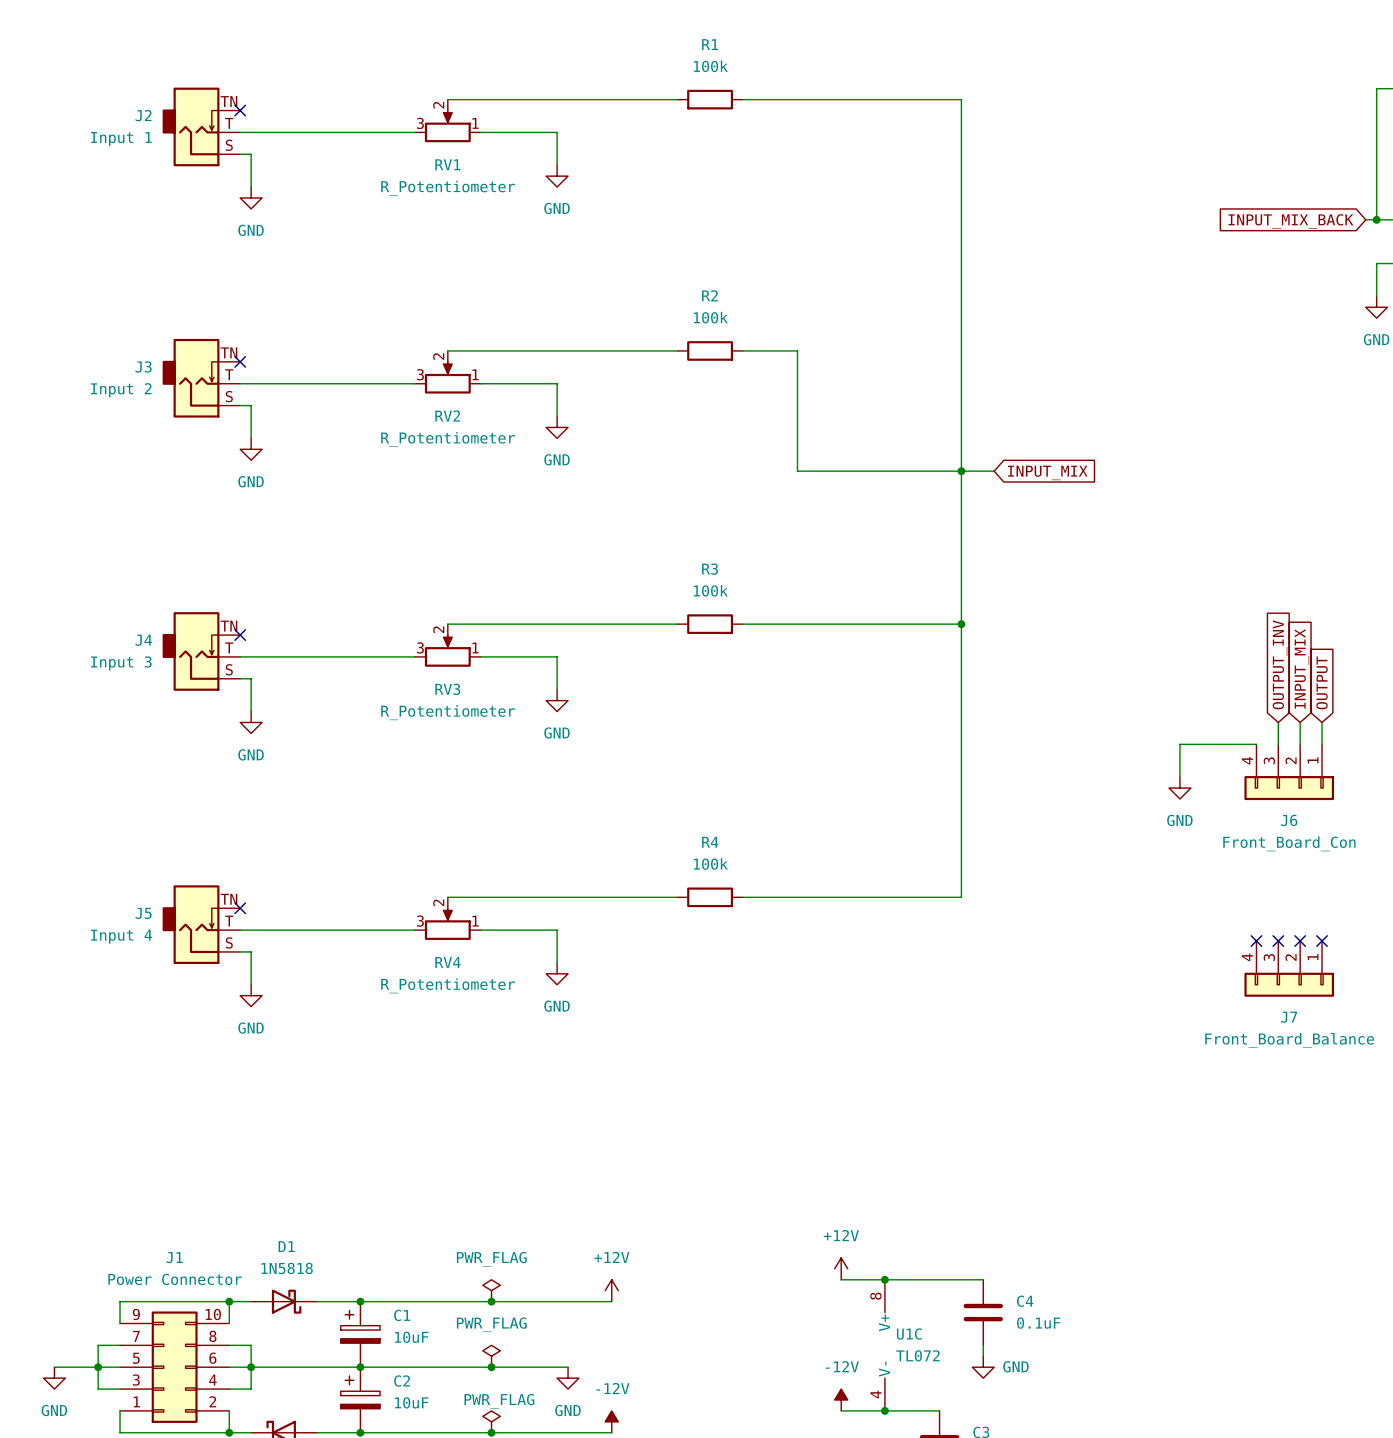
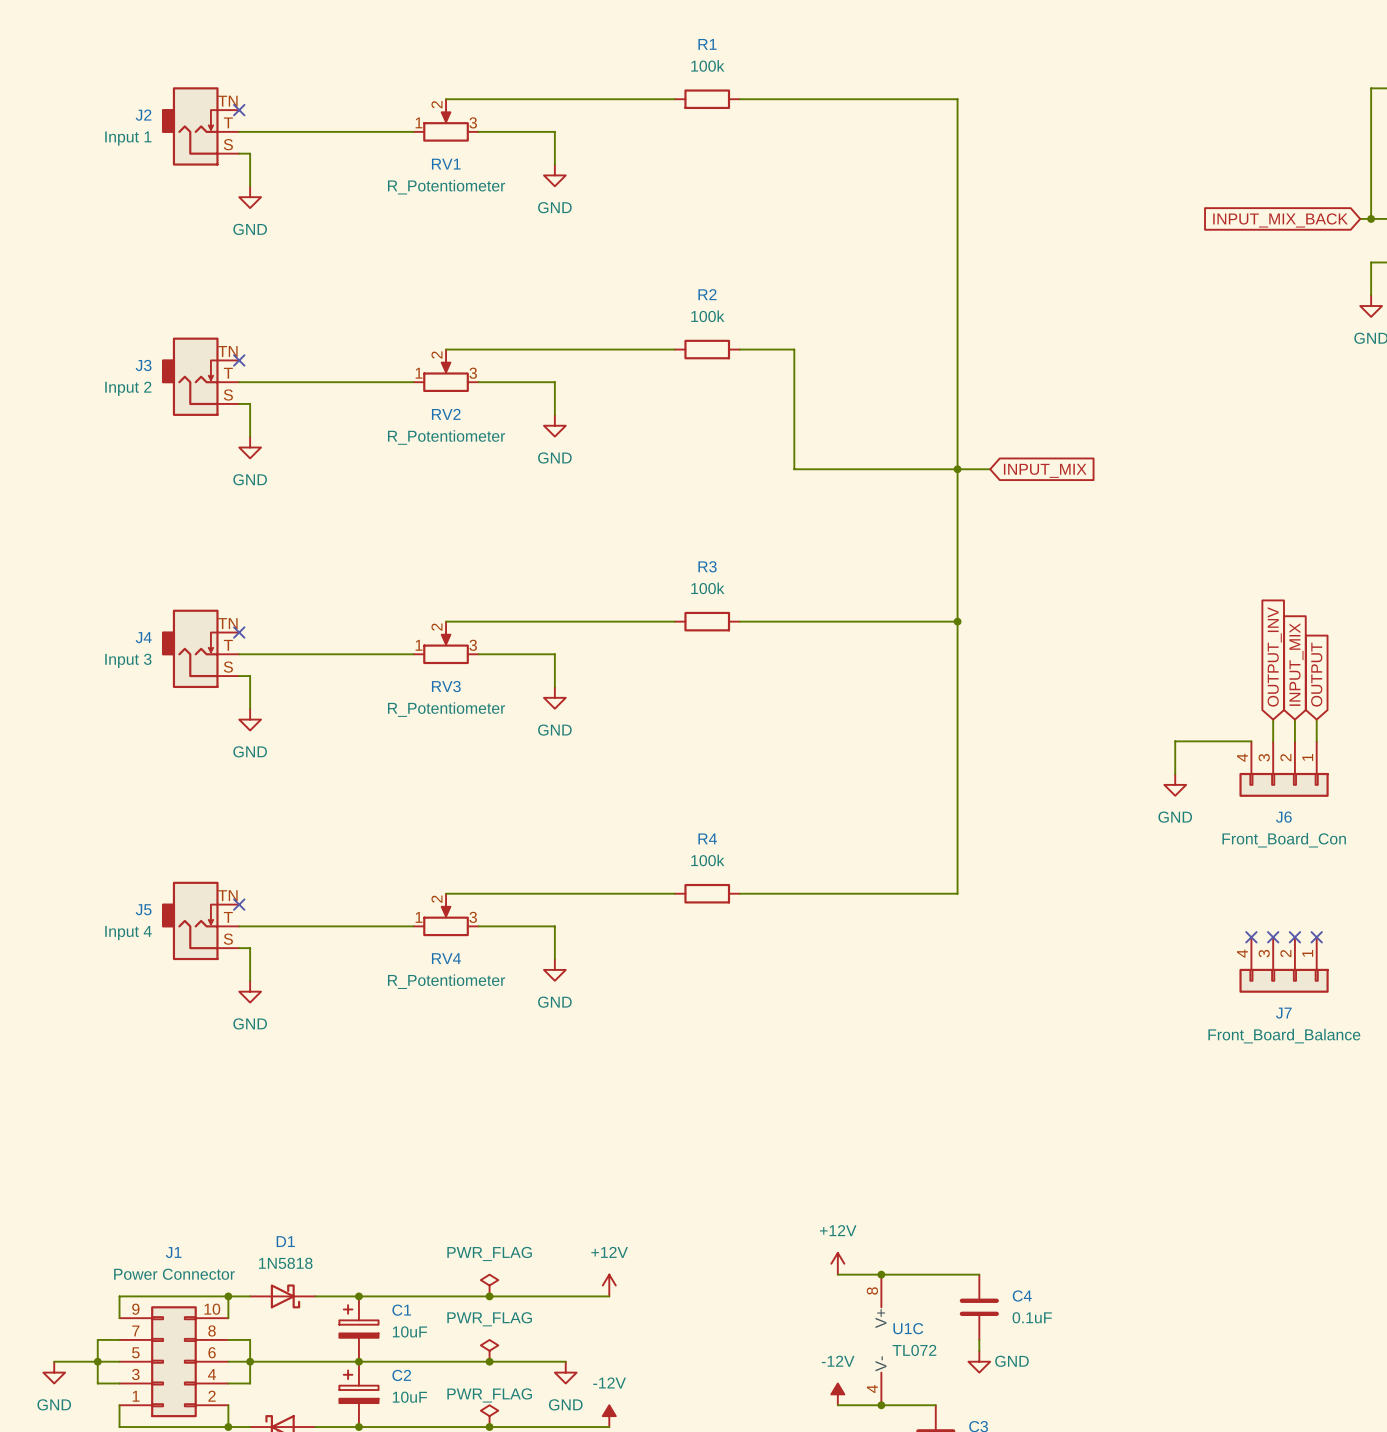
RV1 flip: as is (447, 126) -> left-right (446, 125)
RV2 flip: as is (447, 377) -> left-right (446, 376)
RV3 flip: as is (447, 650) -> left-right (446, 648)
RV4 flip: as is (447, 924) -> left-right (446, 920)

